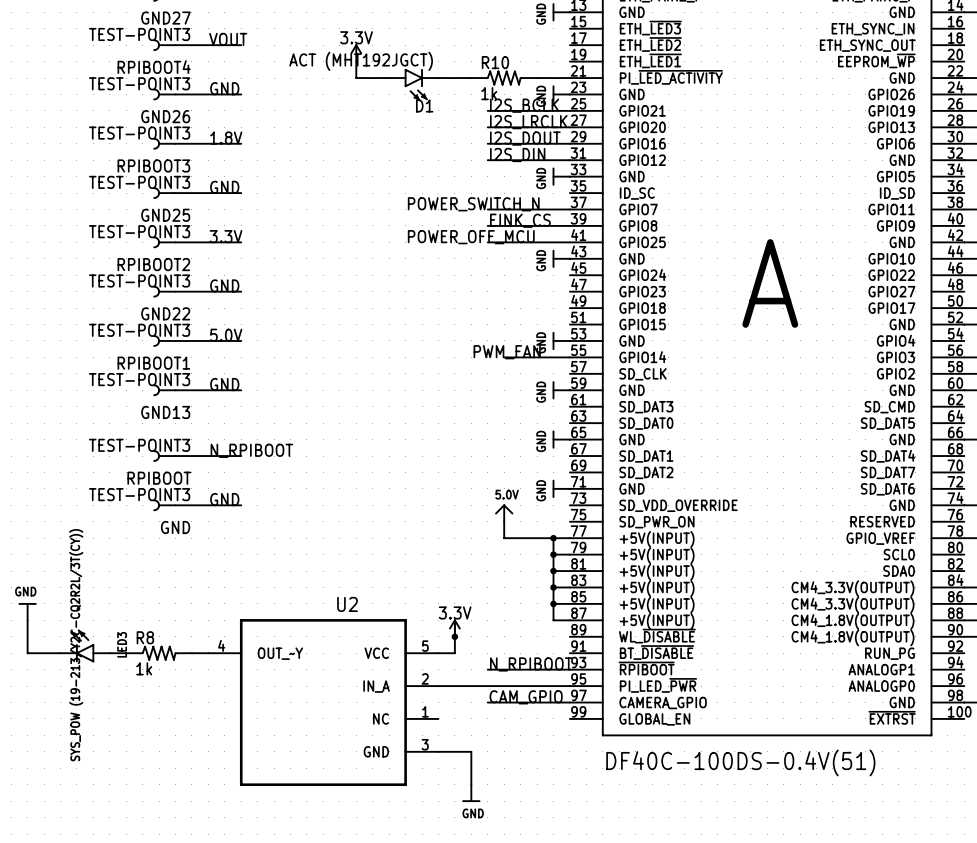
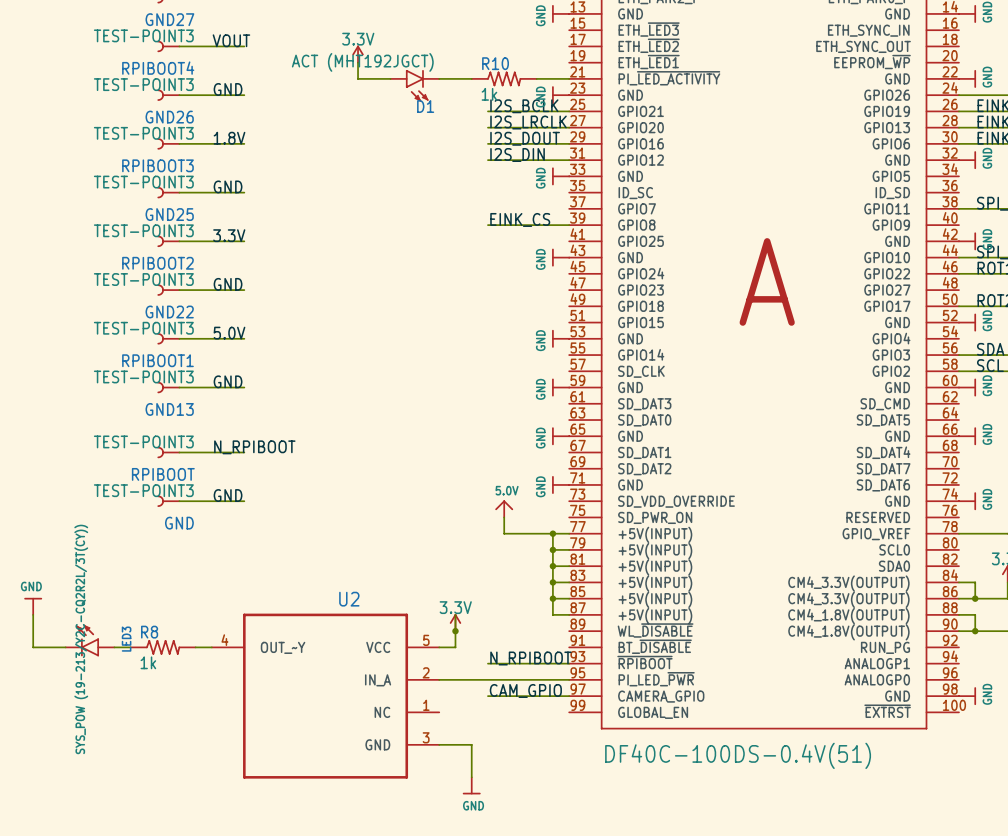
label: POWER_SWITCH_N (473, 204) -> none
wire: (487, 209) (569, 209) -> none
label: POWER_OFF_MCU (471, 237) -> none
wire: (487, 242) (569, 242) -> none
label: PWM_FAN (507, 352) -> none
wire: (504, 357) (569, 357) -> none

